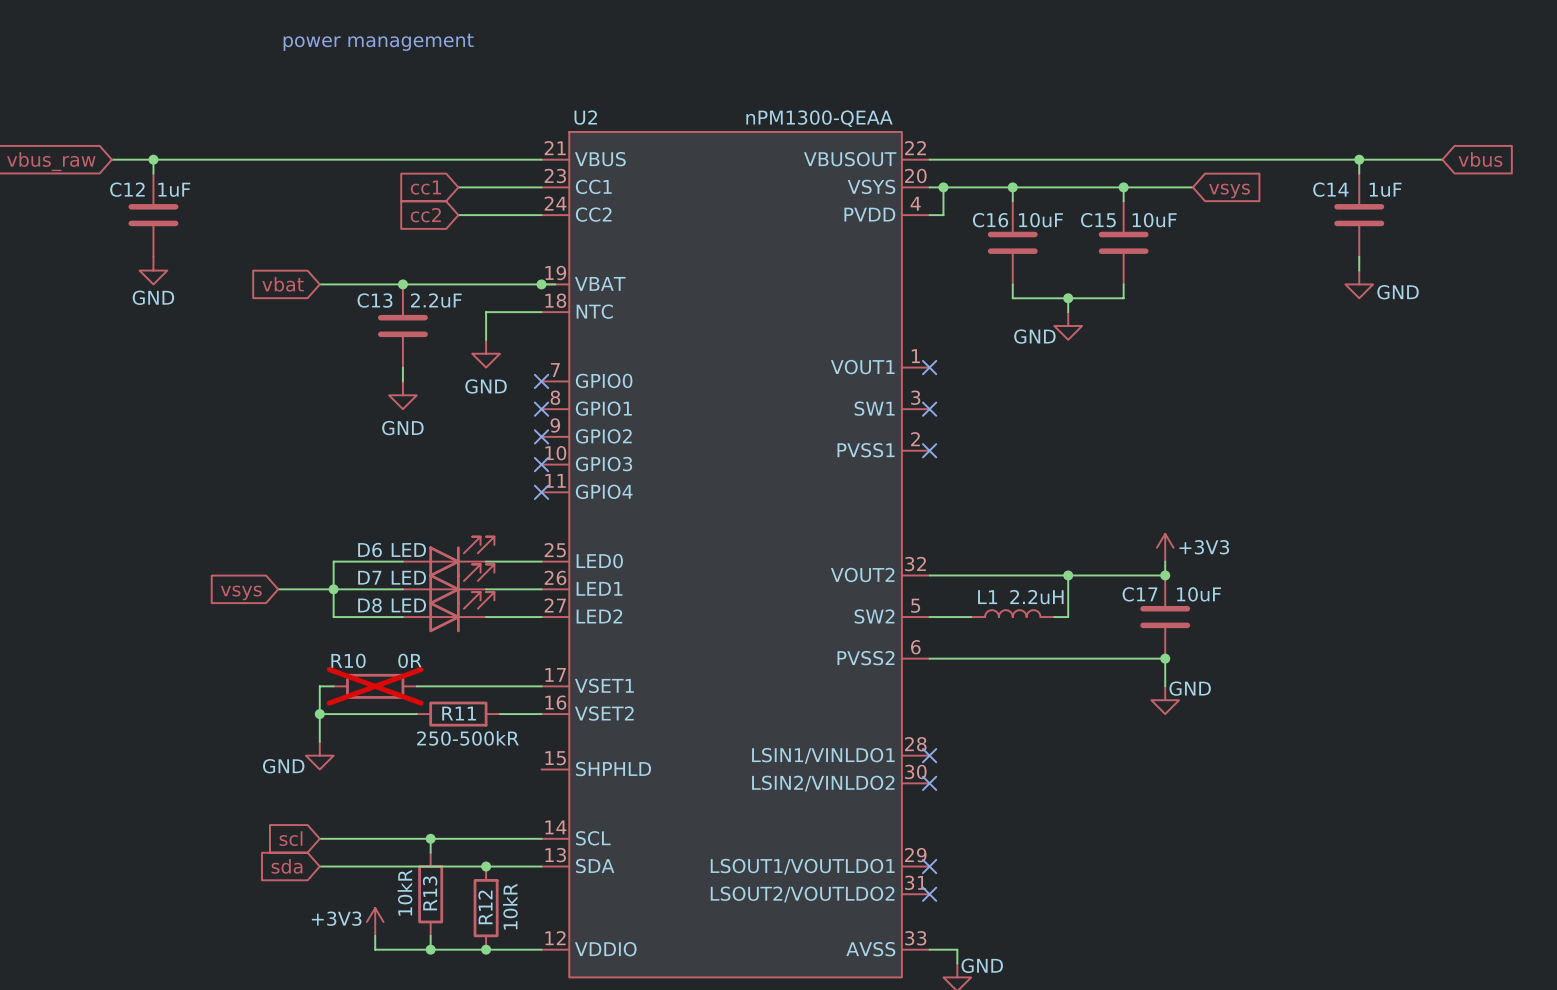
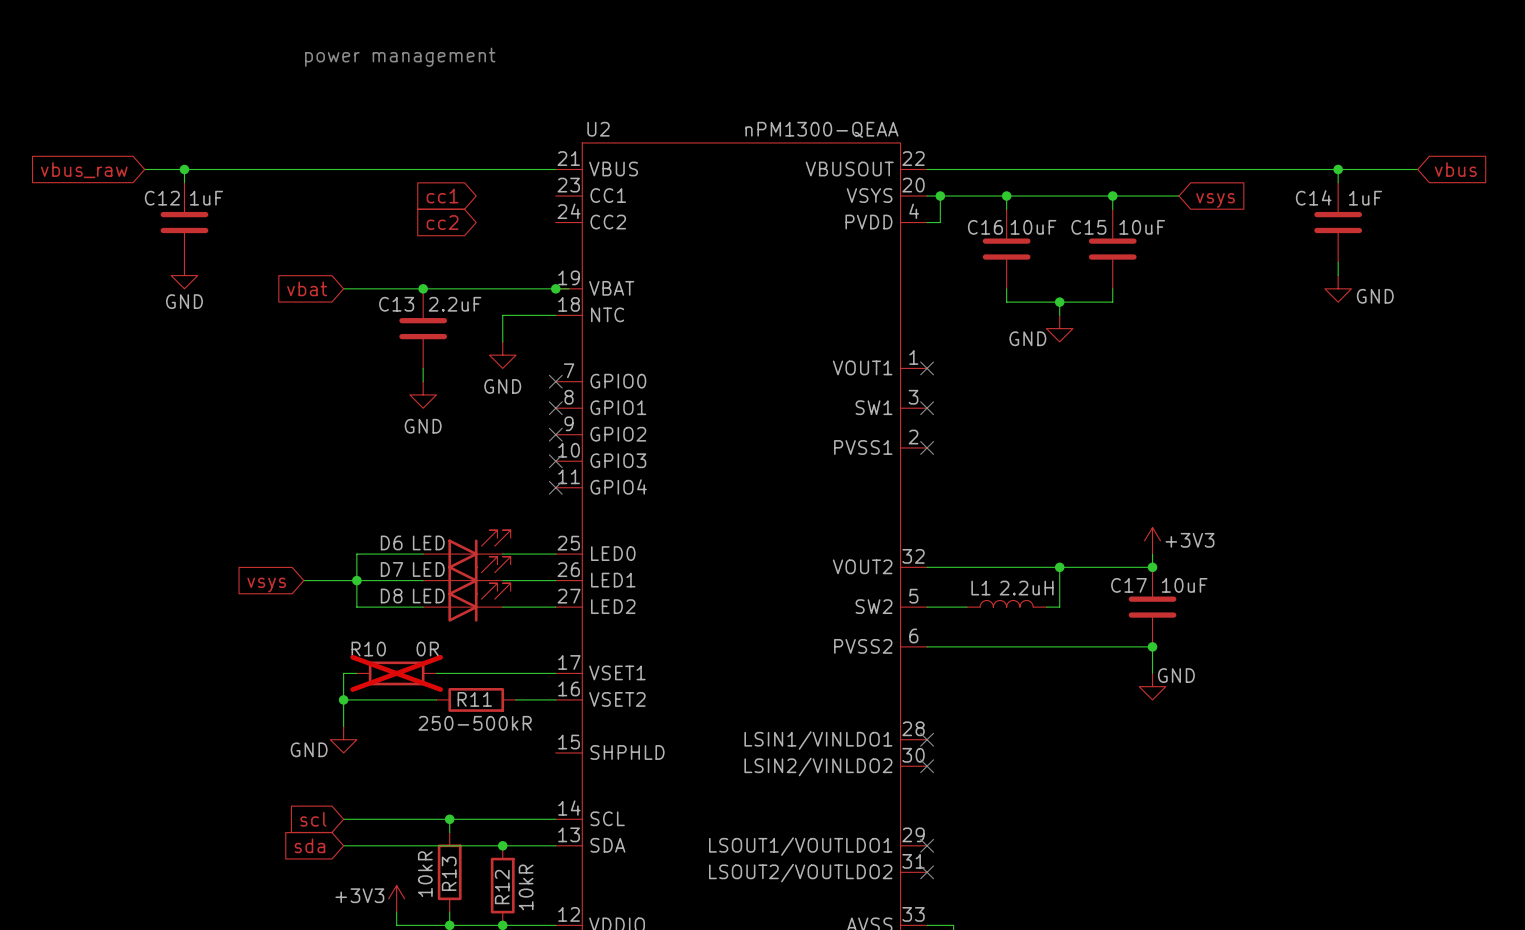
wire: (458, 187) (541, 187) -> none
wire: (458, 215) (541, 215) -> none

